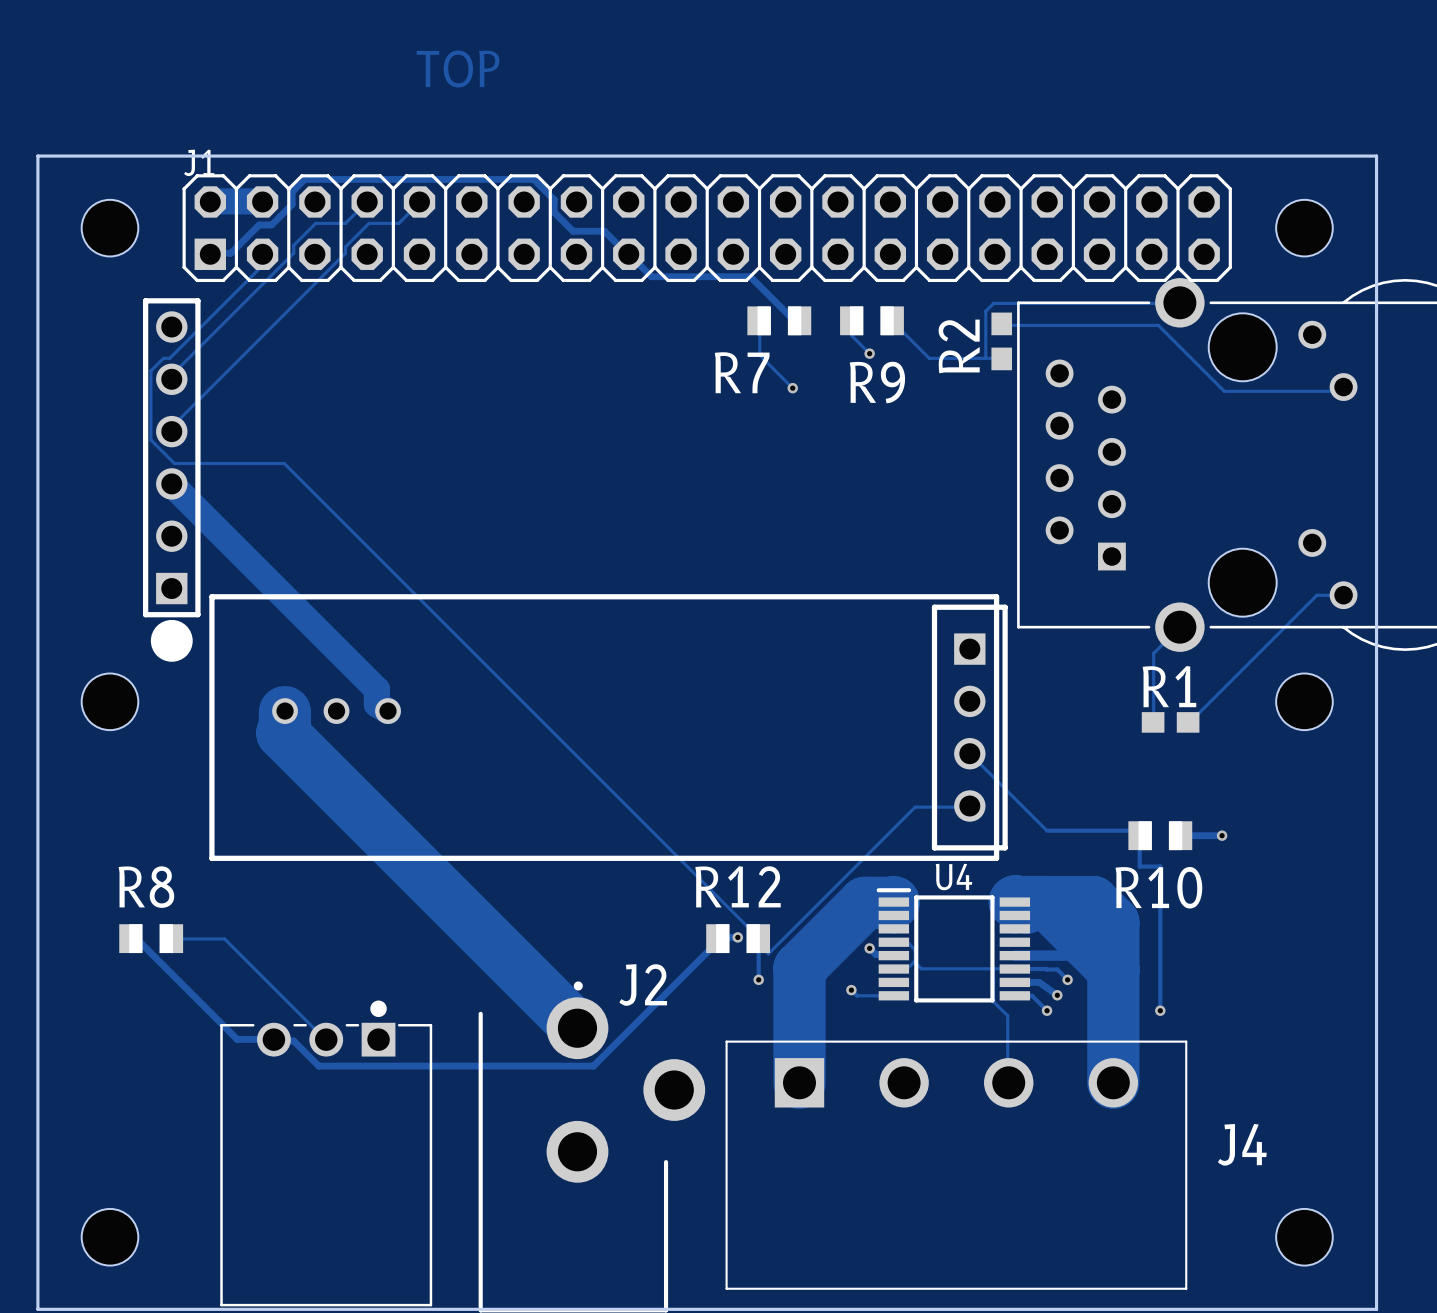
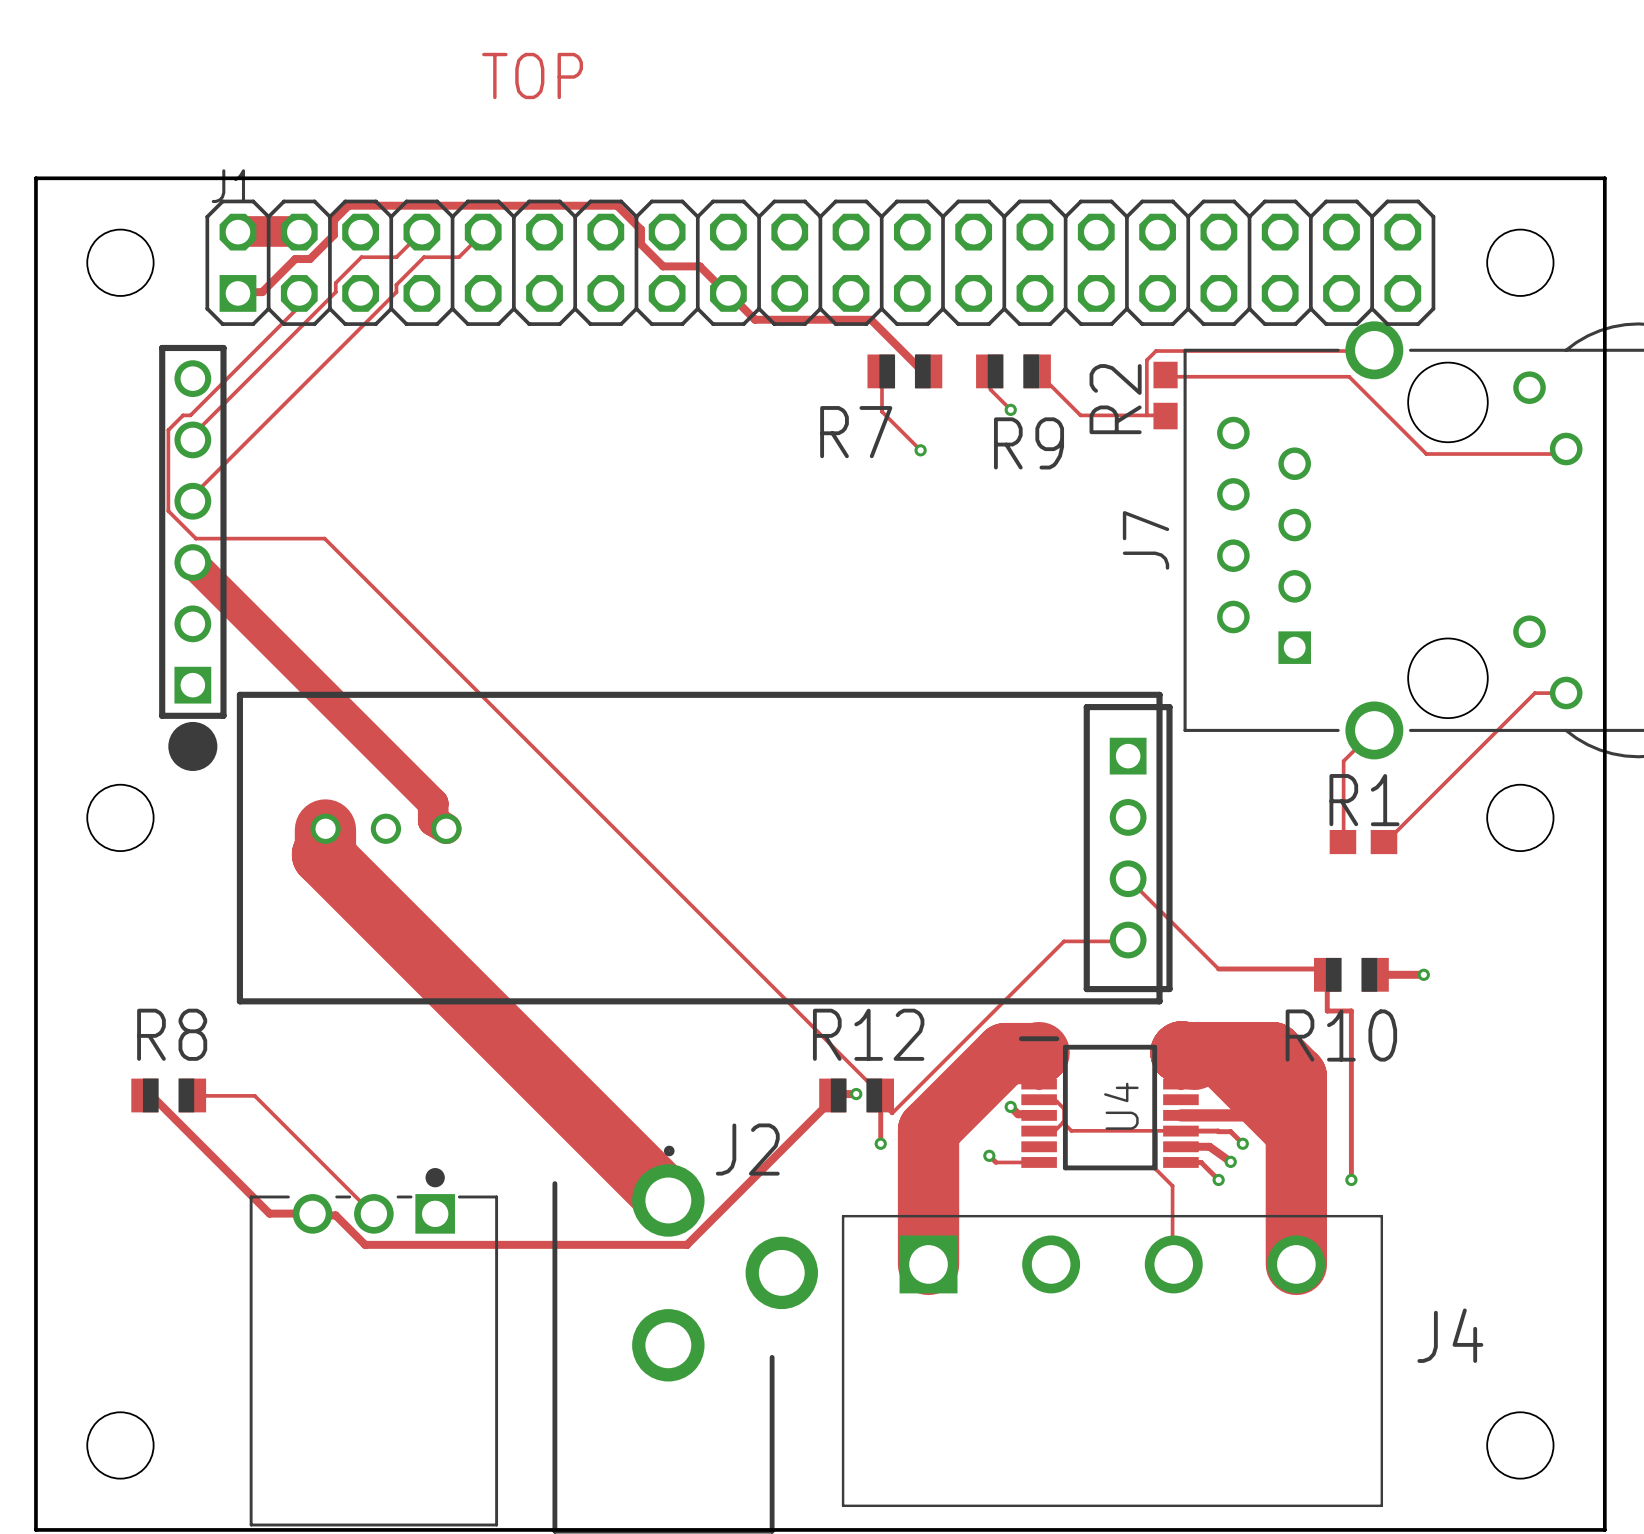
J7 name: none -> J7 (1146, 540)
U4 name rotation: 0° (953, 877) -> 90° counterclockwise (1121, 1106)
U4 name position: U4 (953, 877) -> U4 (1121, 1106)

